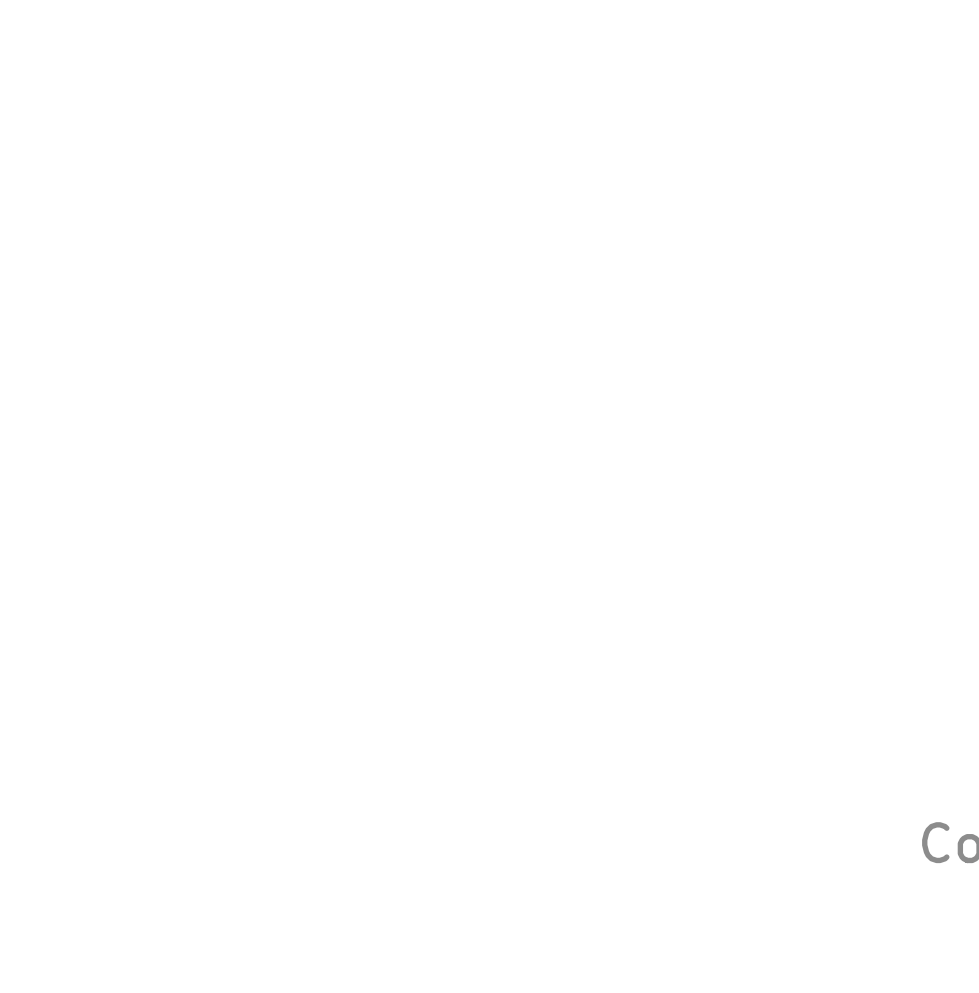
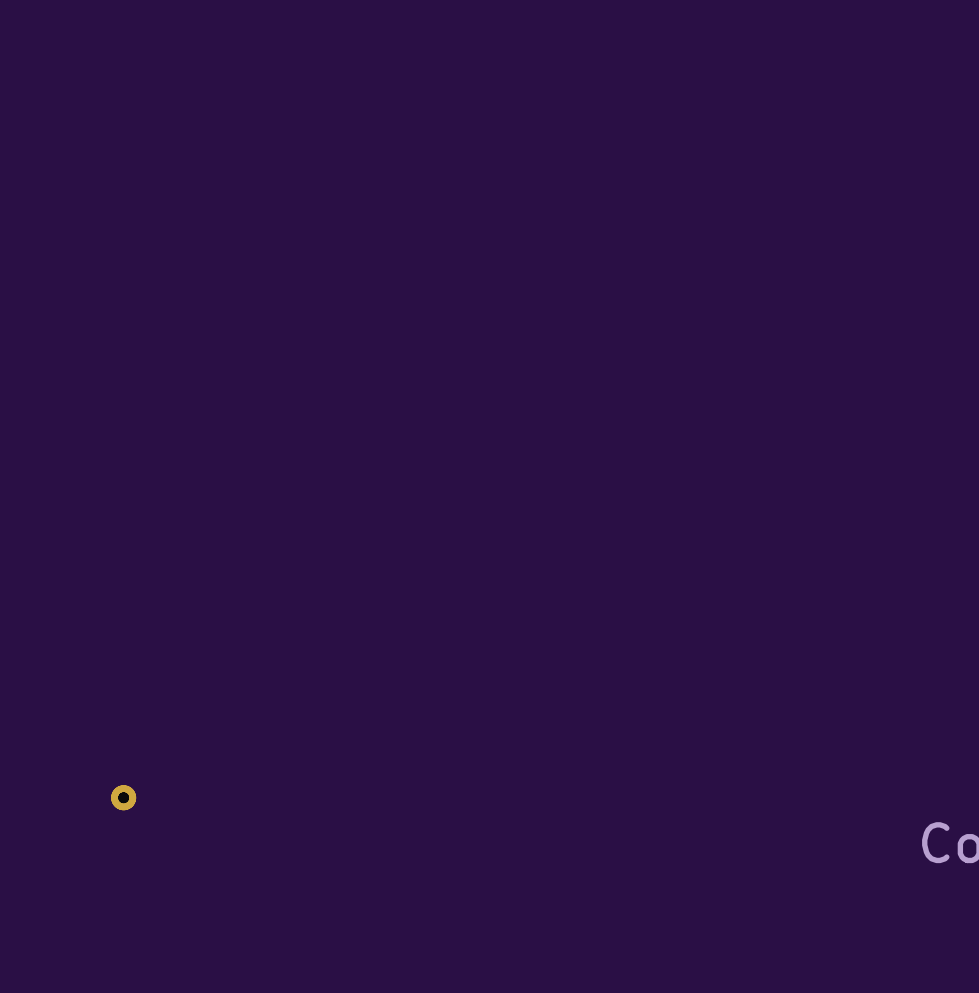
via: none -> (123, 797)

